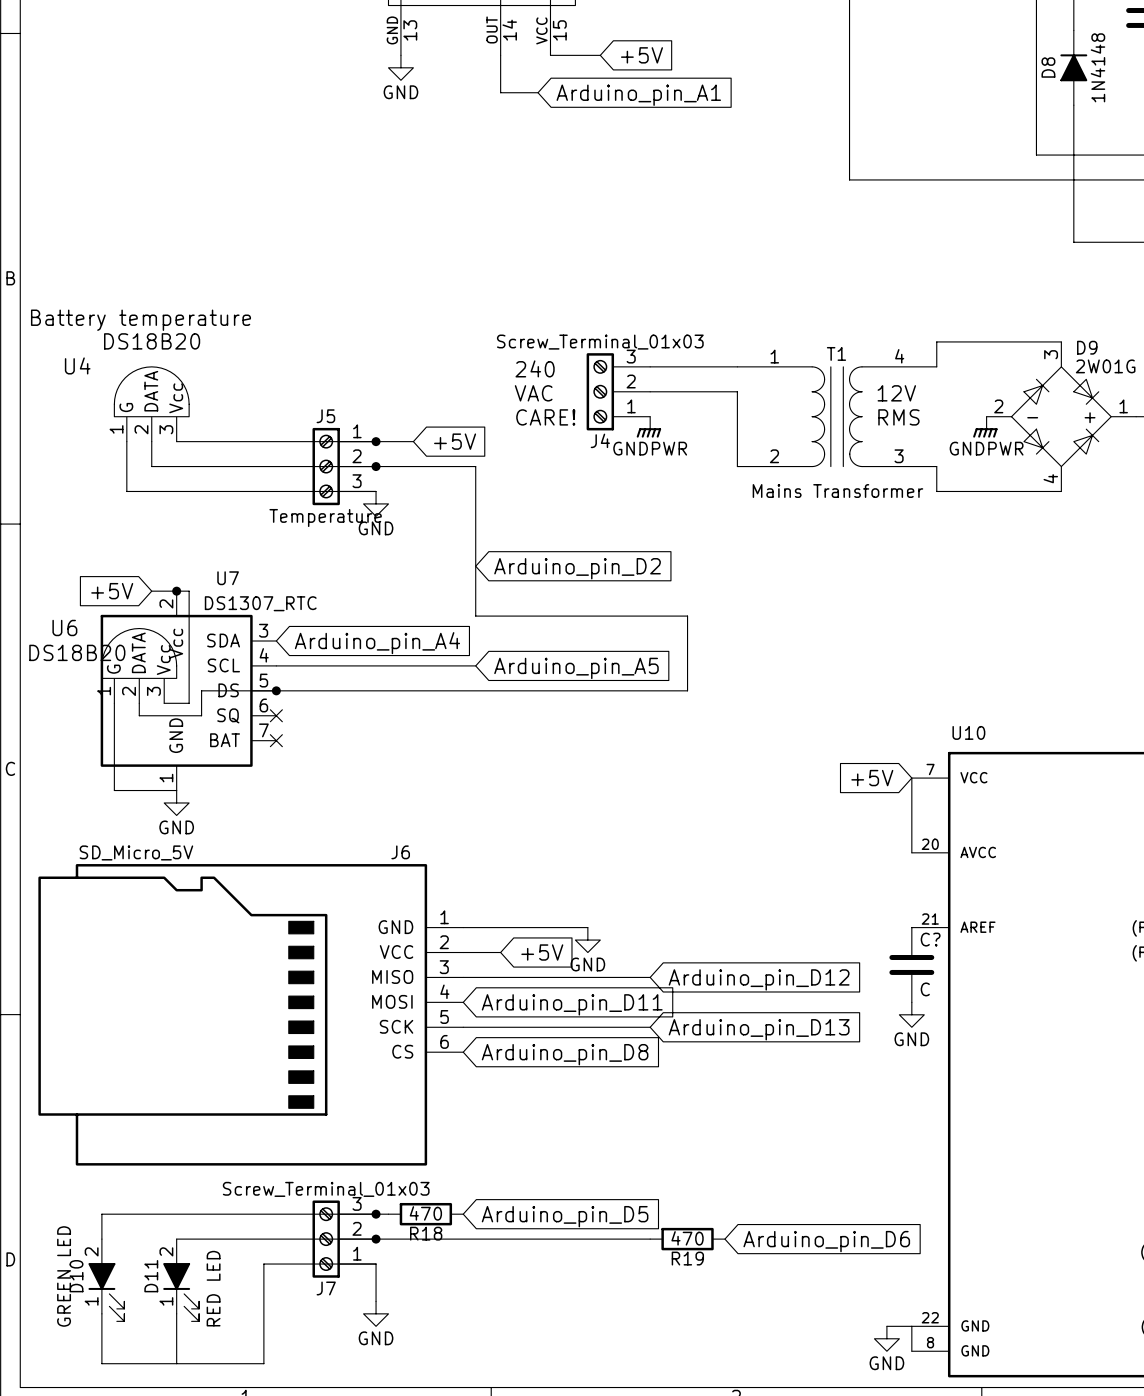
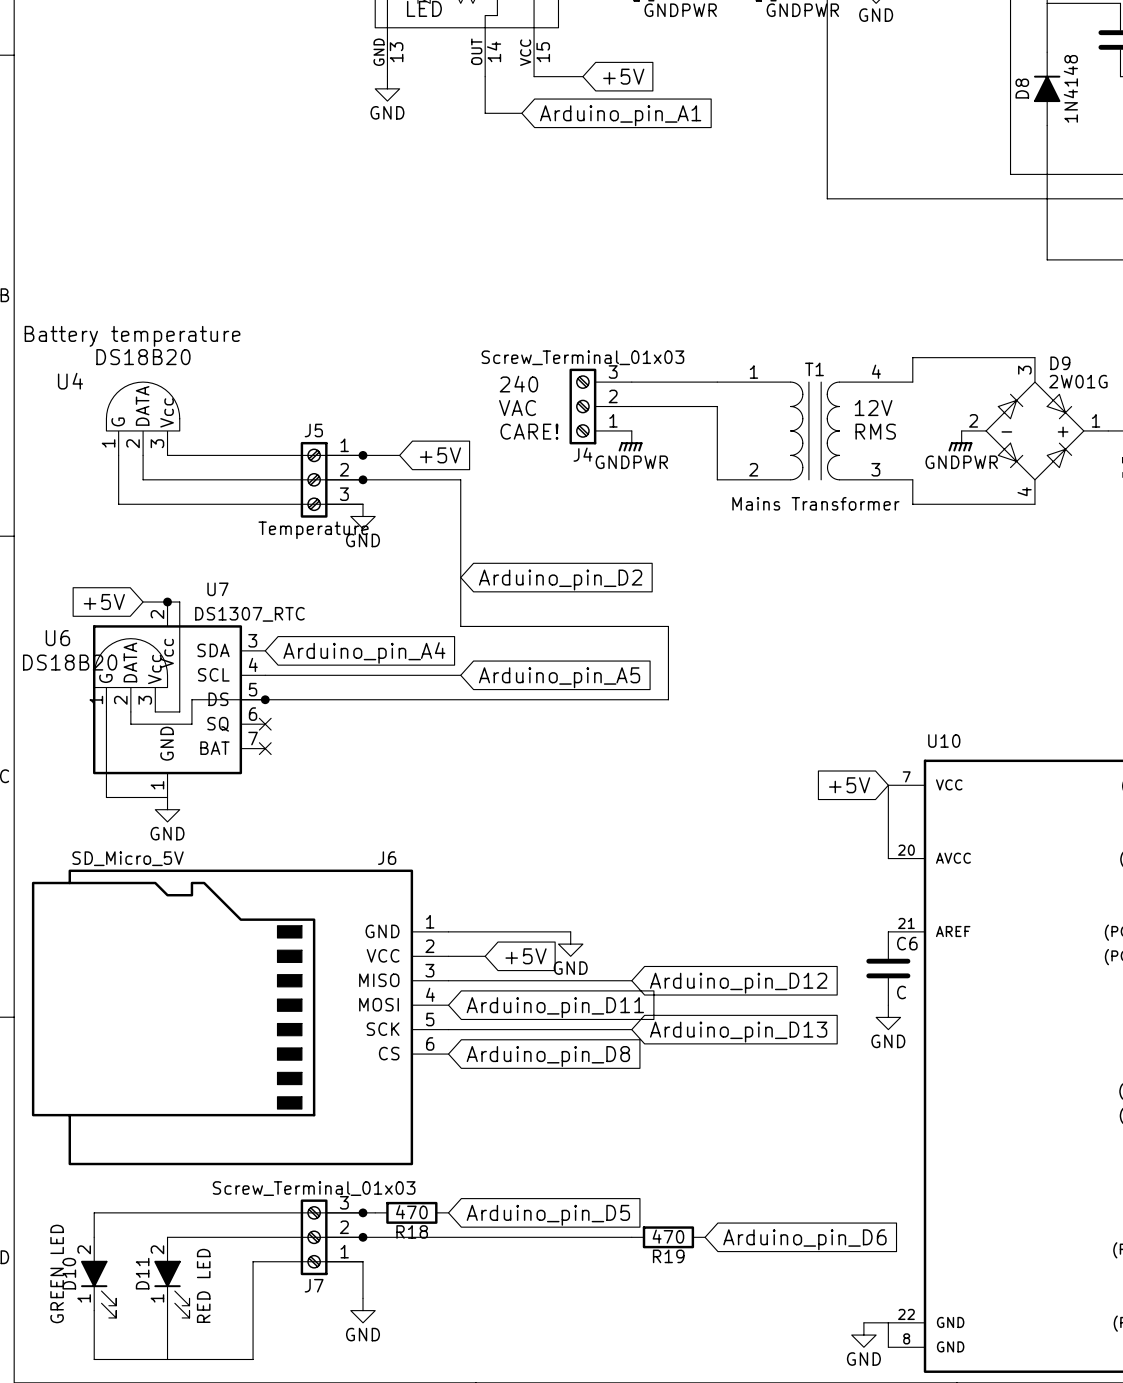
C? name: C? (930, 939) -> C6 (907, 943)

